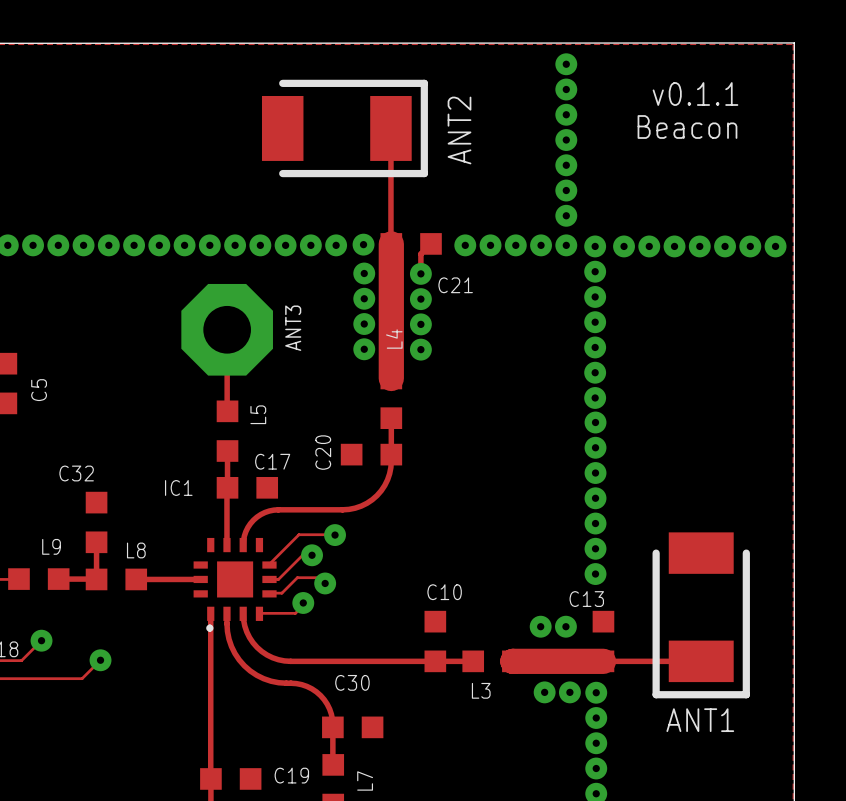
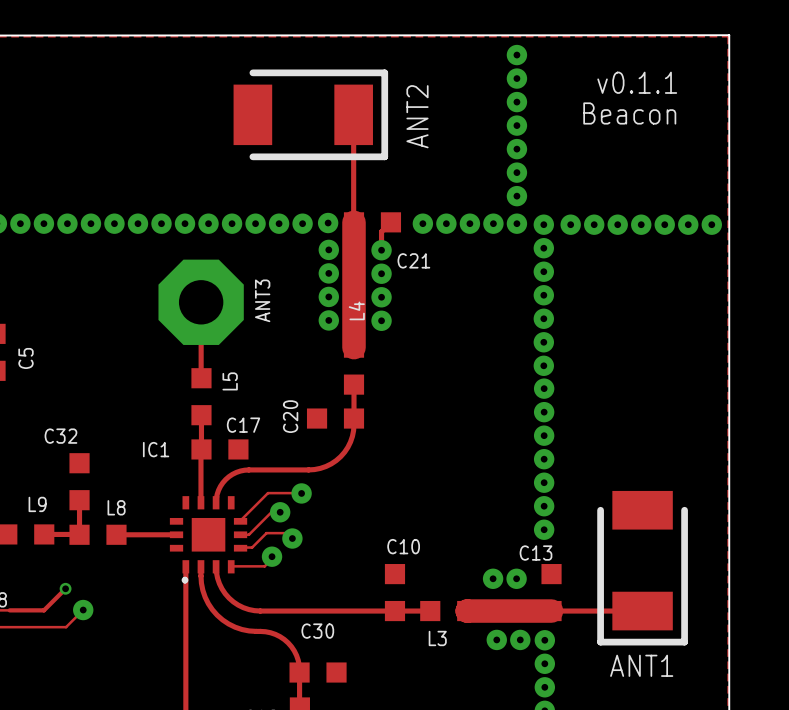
via: none -> (65, 588)
track: (41, 640) (21, 660) -> (65, 588) (44, 610) (9, 610)
via: (41, 640) -> none

